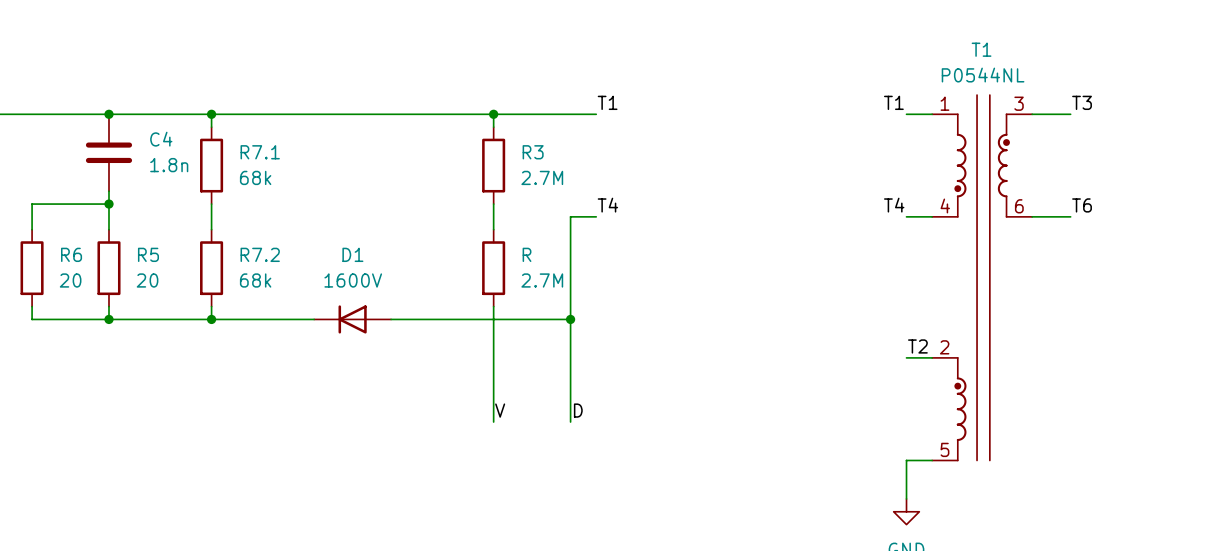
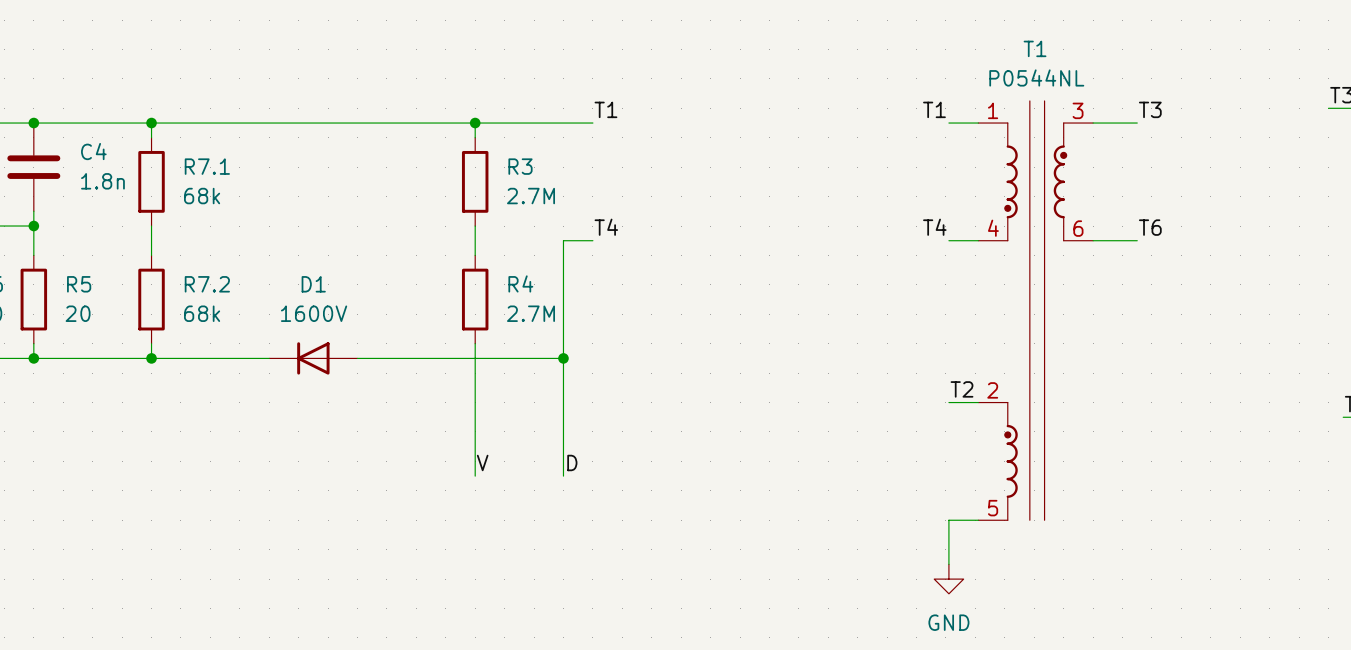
R name: R (527, 254) -> R4 (520, 283)

